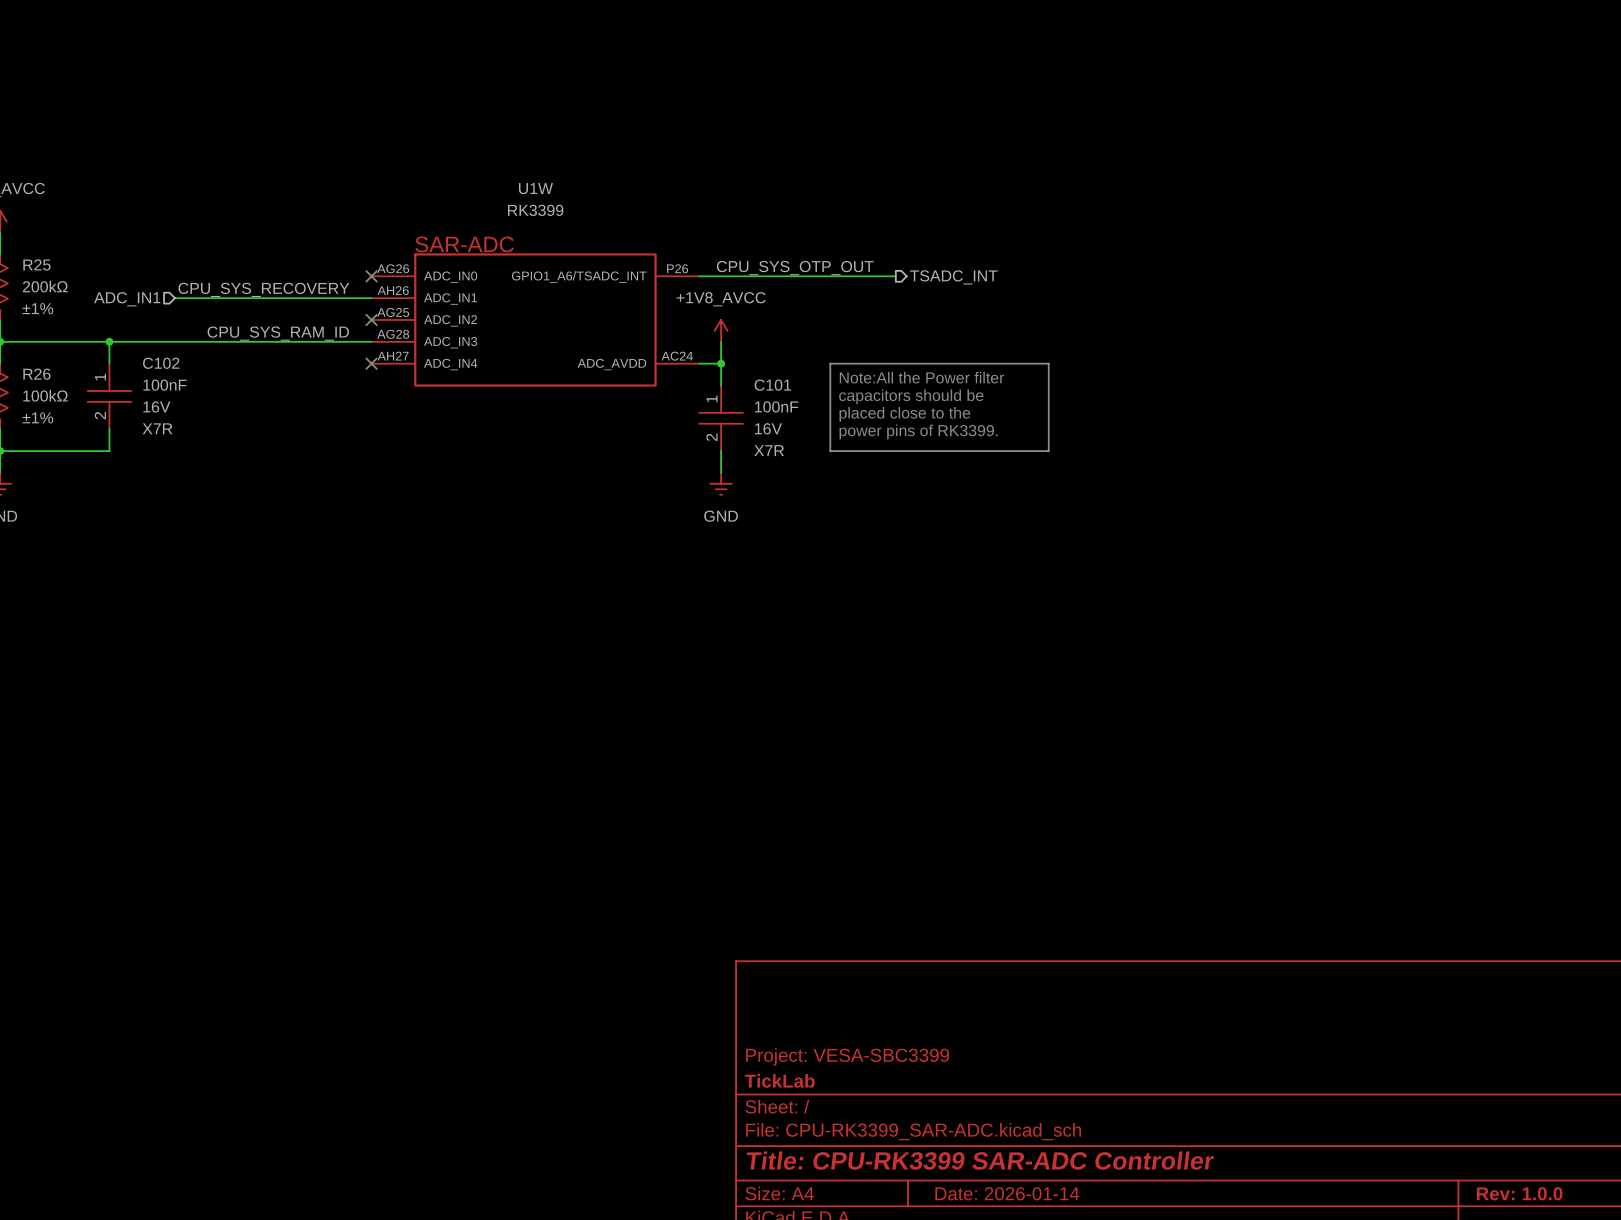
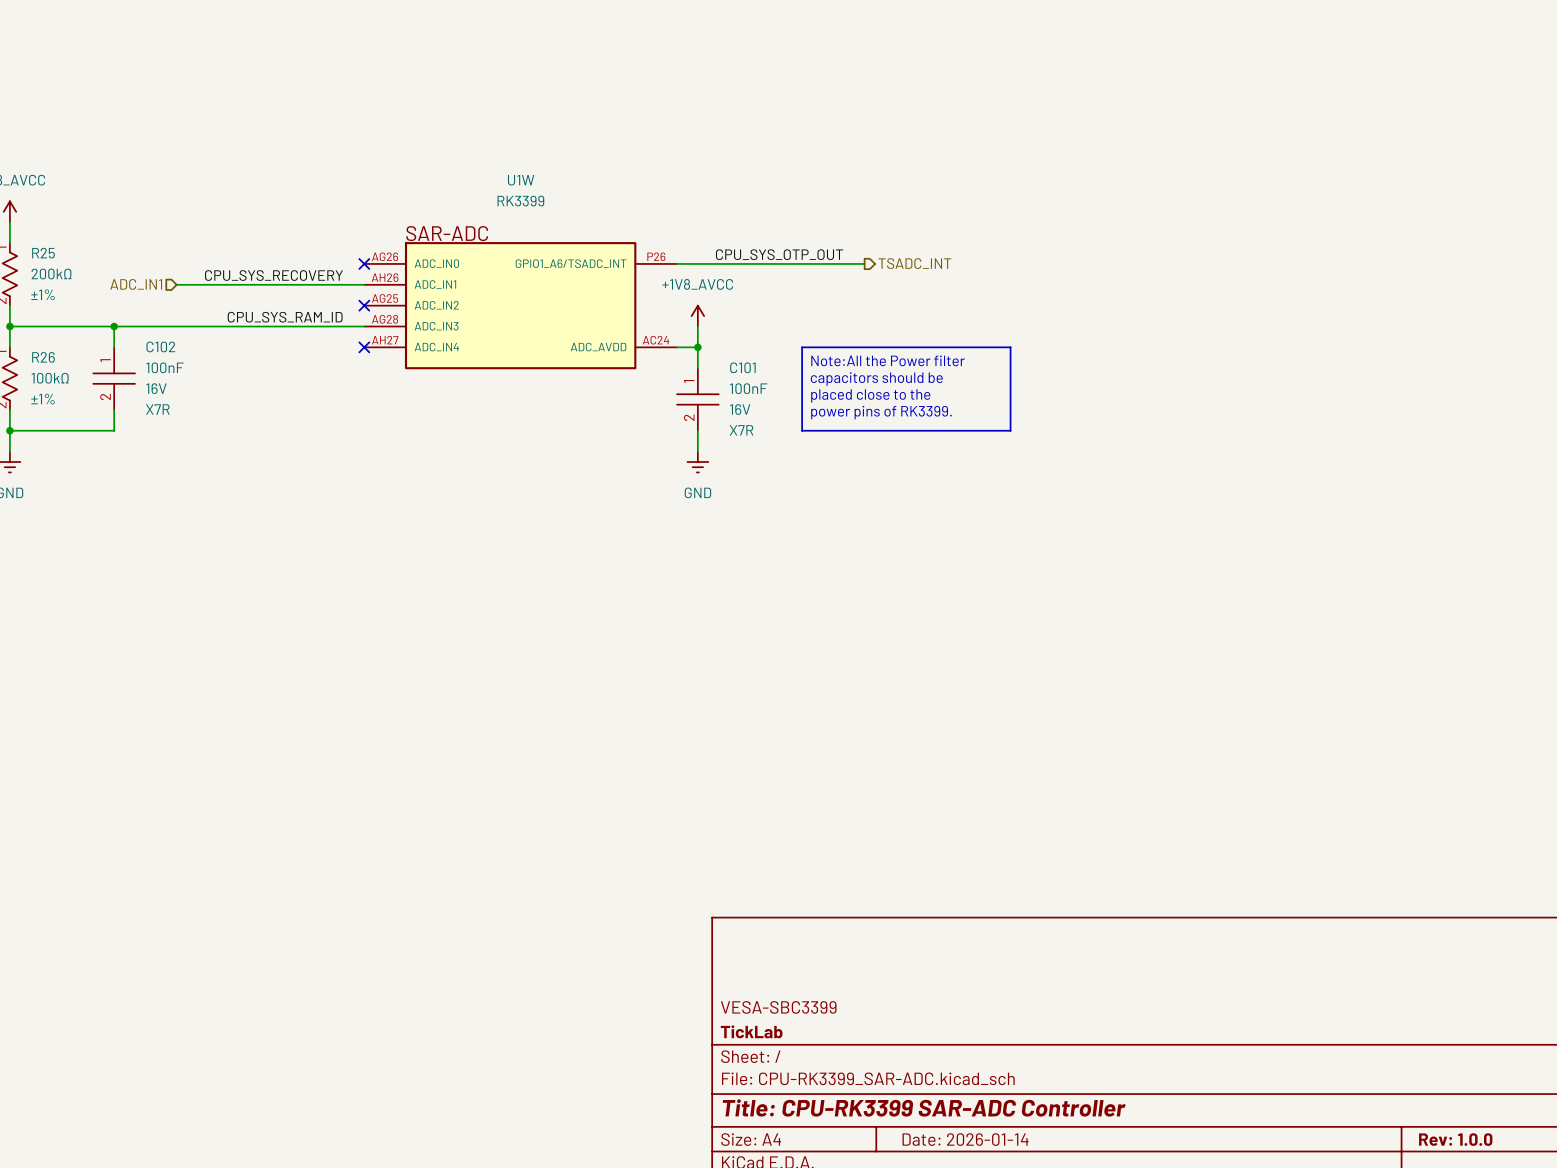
title block: Project: VESA-SBC3399 (847, 1056) -> VESA-SBC3399 (778, 1007)

